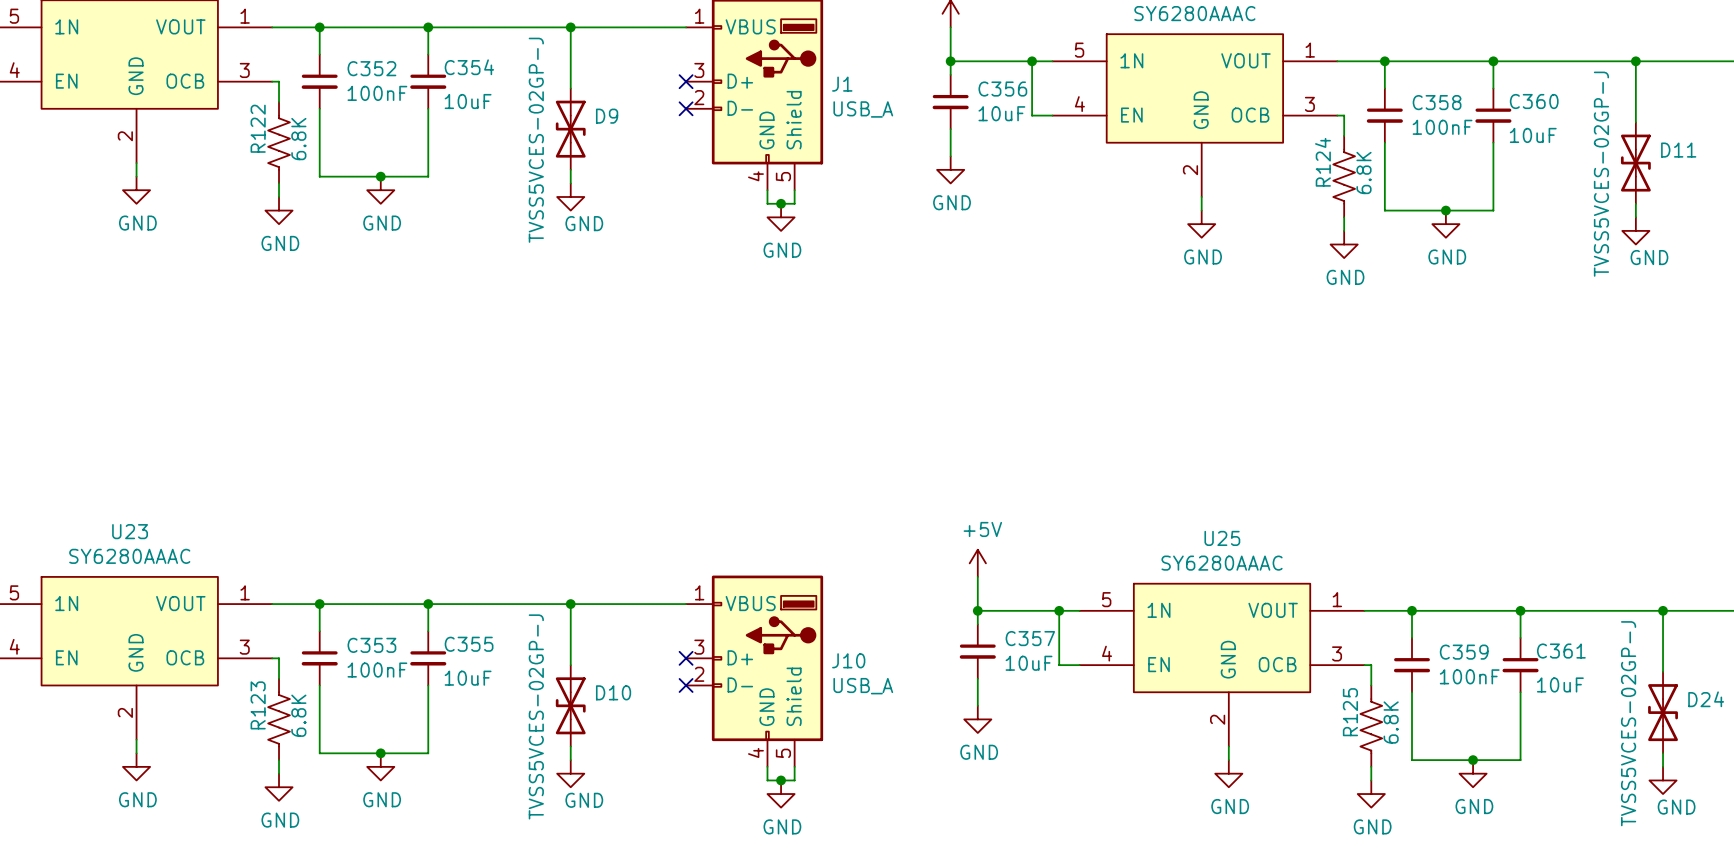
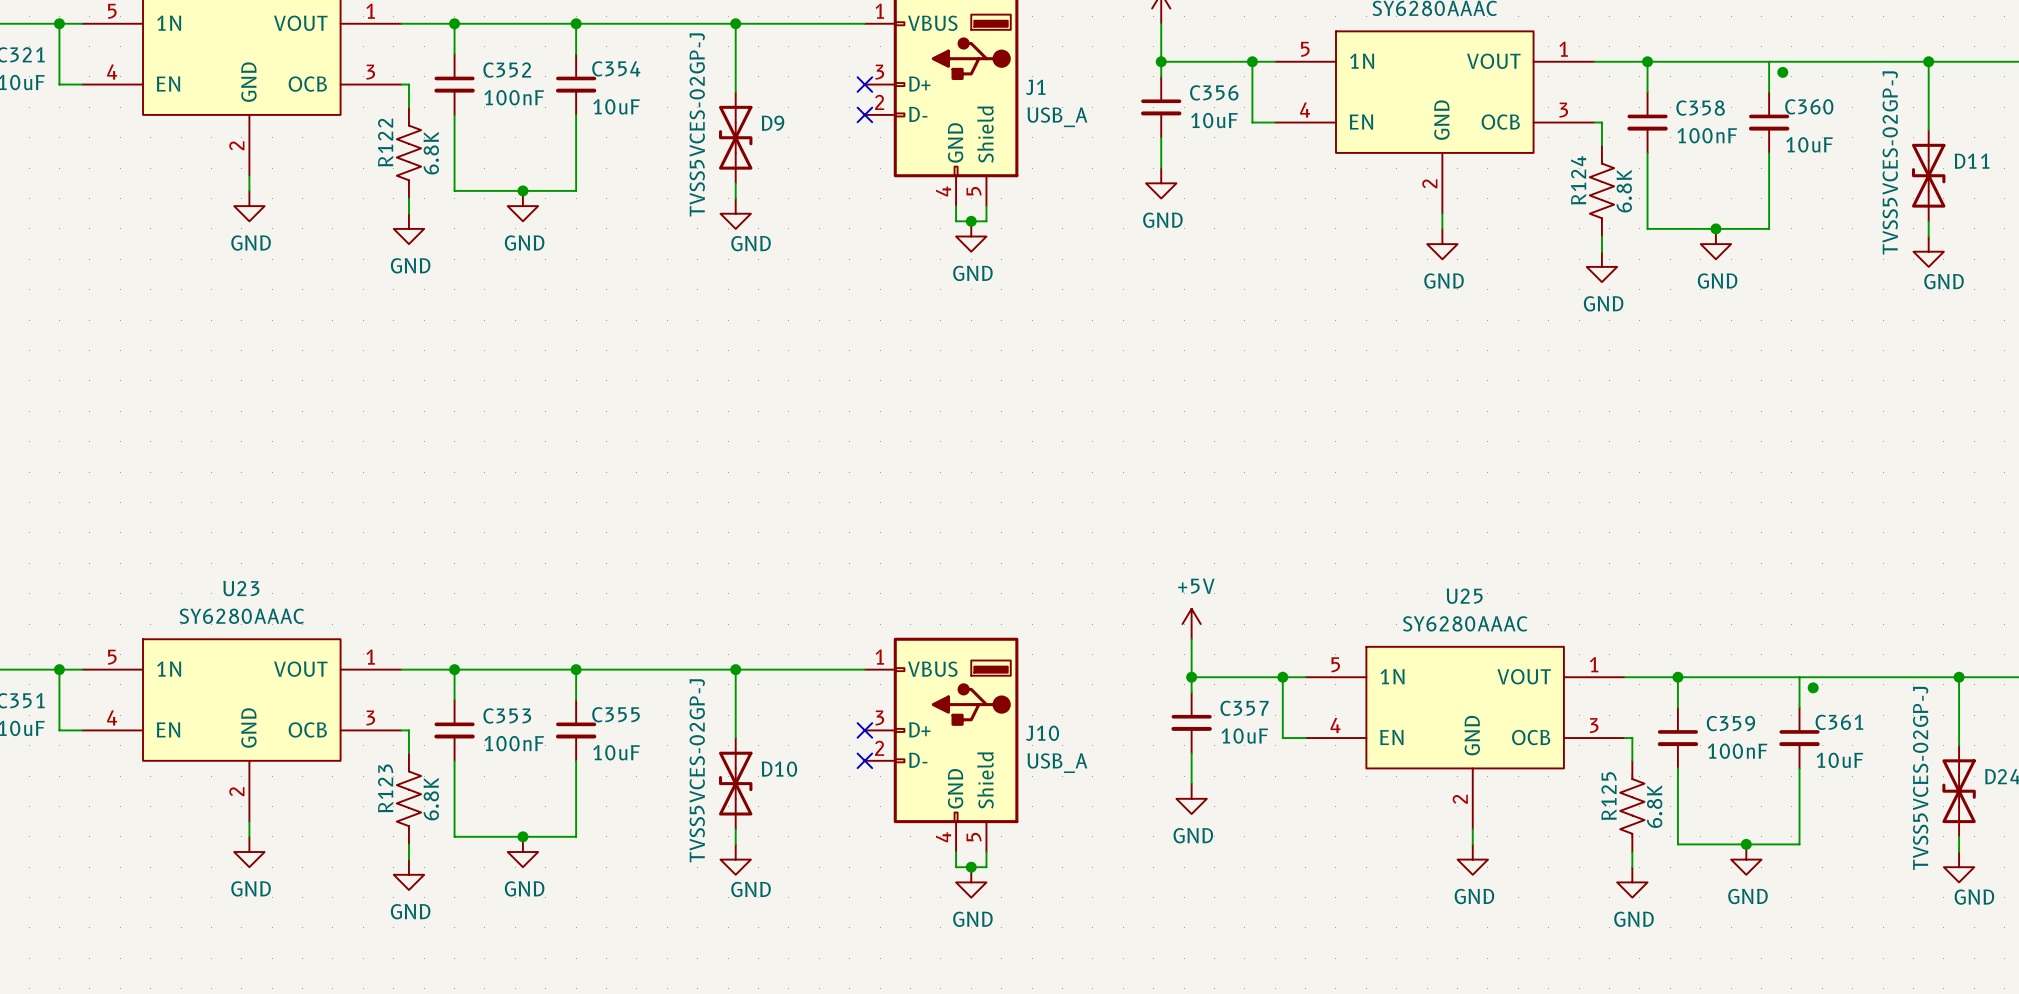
junction position: (1493, 61) -> (1782, 72)
junction position: (1520, 610) -> (1813, 687)

